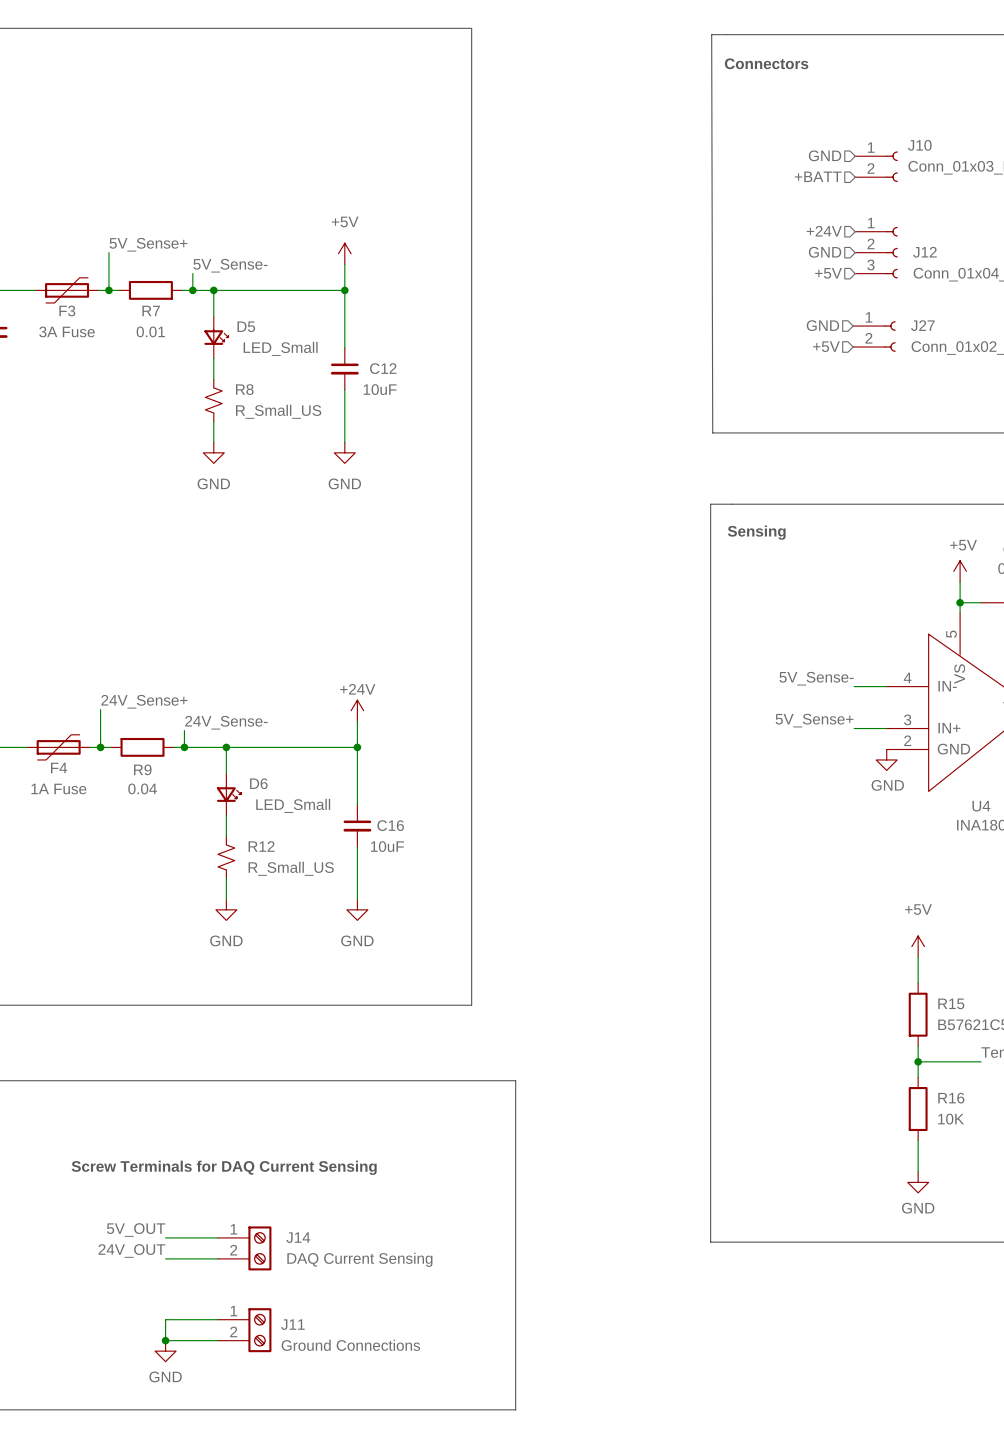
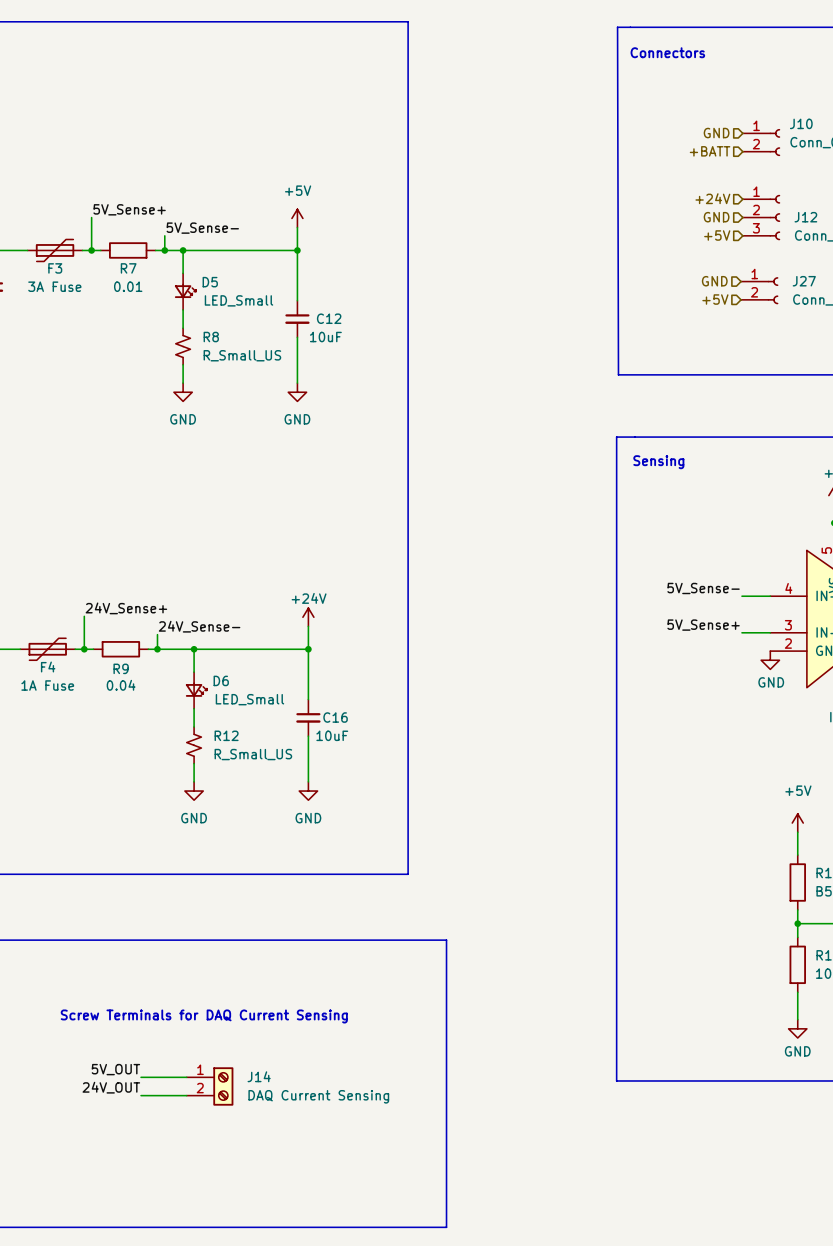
wire: (217, 1319) (165, 1319) (165, 1340) (217, 1340) -> none
J11: Ground Connections (244, 1330) -> none
junction: (165, 1340) -> none
power symbol: GND (165, 1351) -> none

